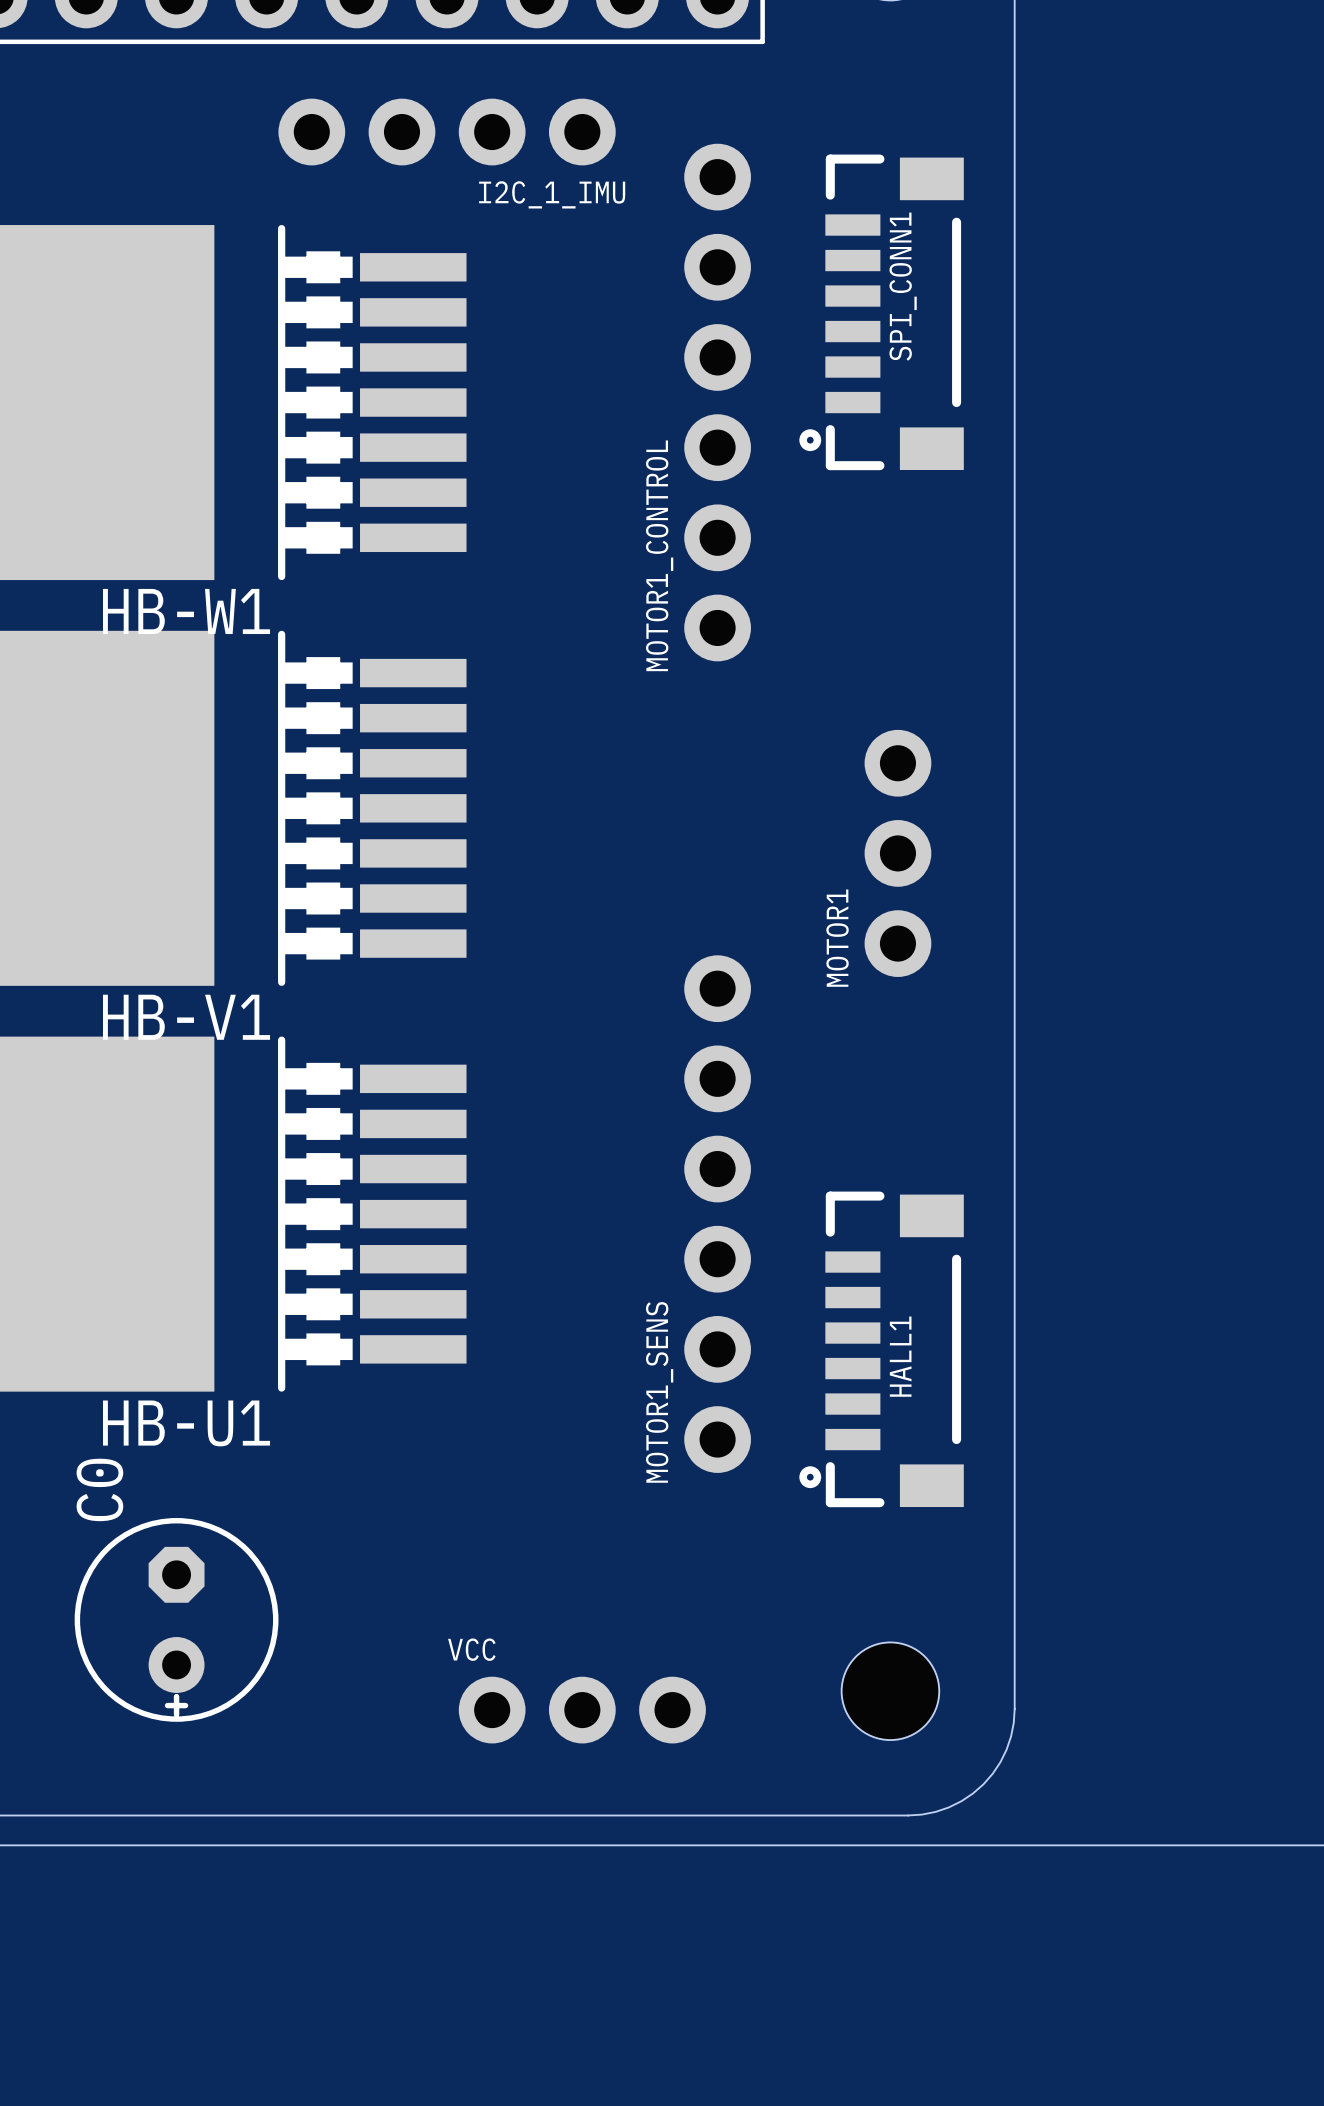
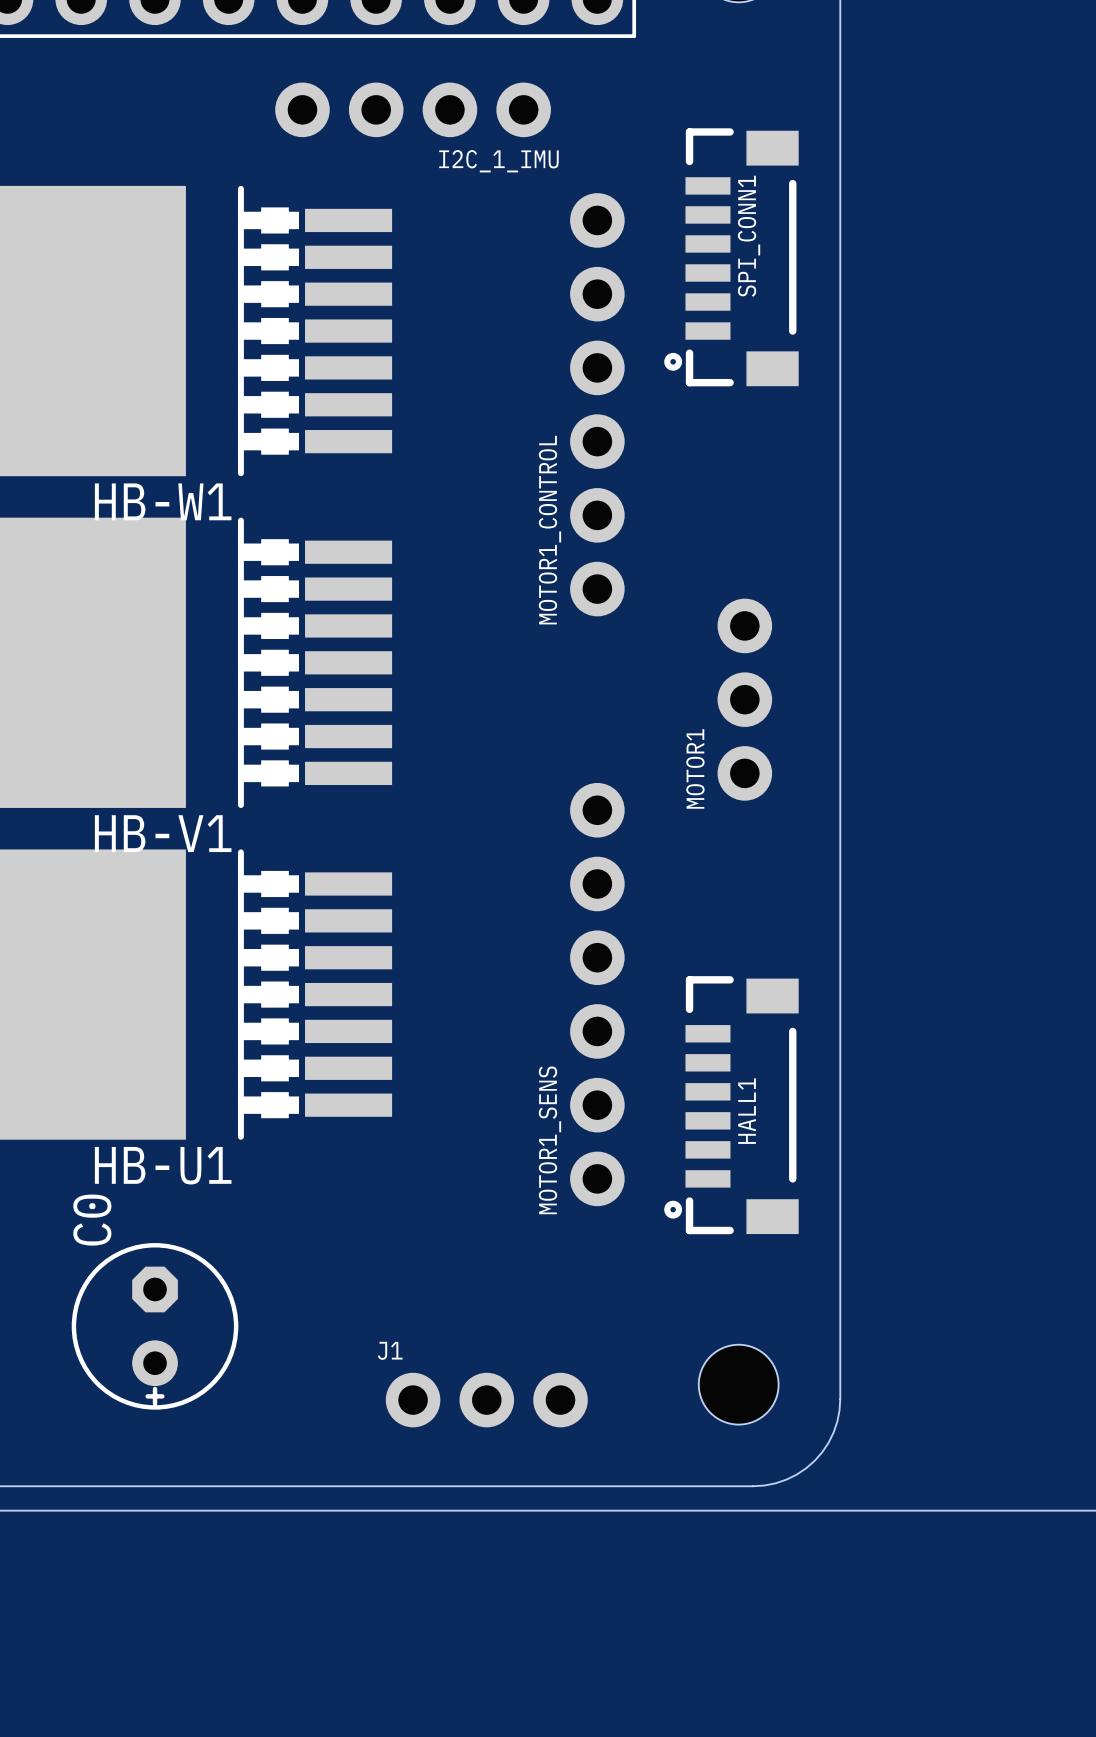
I2C_1_IMU position: (447, 132) -> (413, 109)
MOTOR1_CONTROL position: (717, 402) -> (597, 404)
VCC name: VCC (471, 1649) -> J1 (390, 1350)

